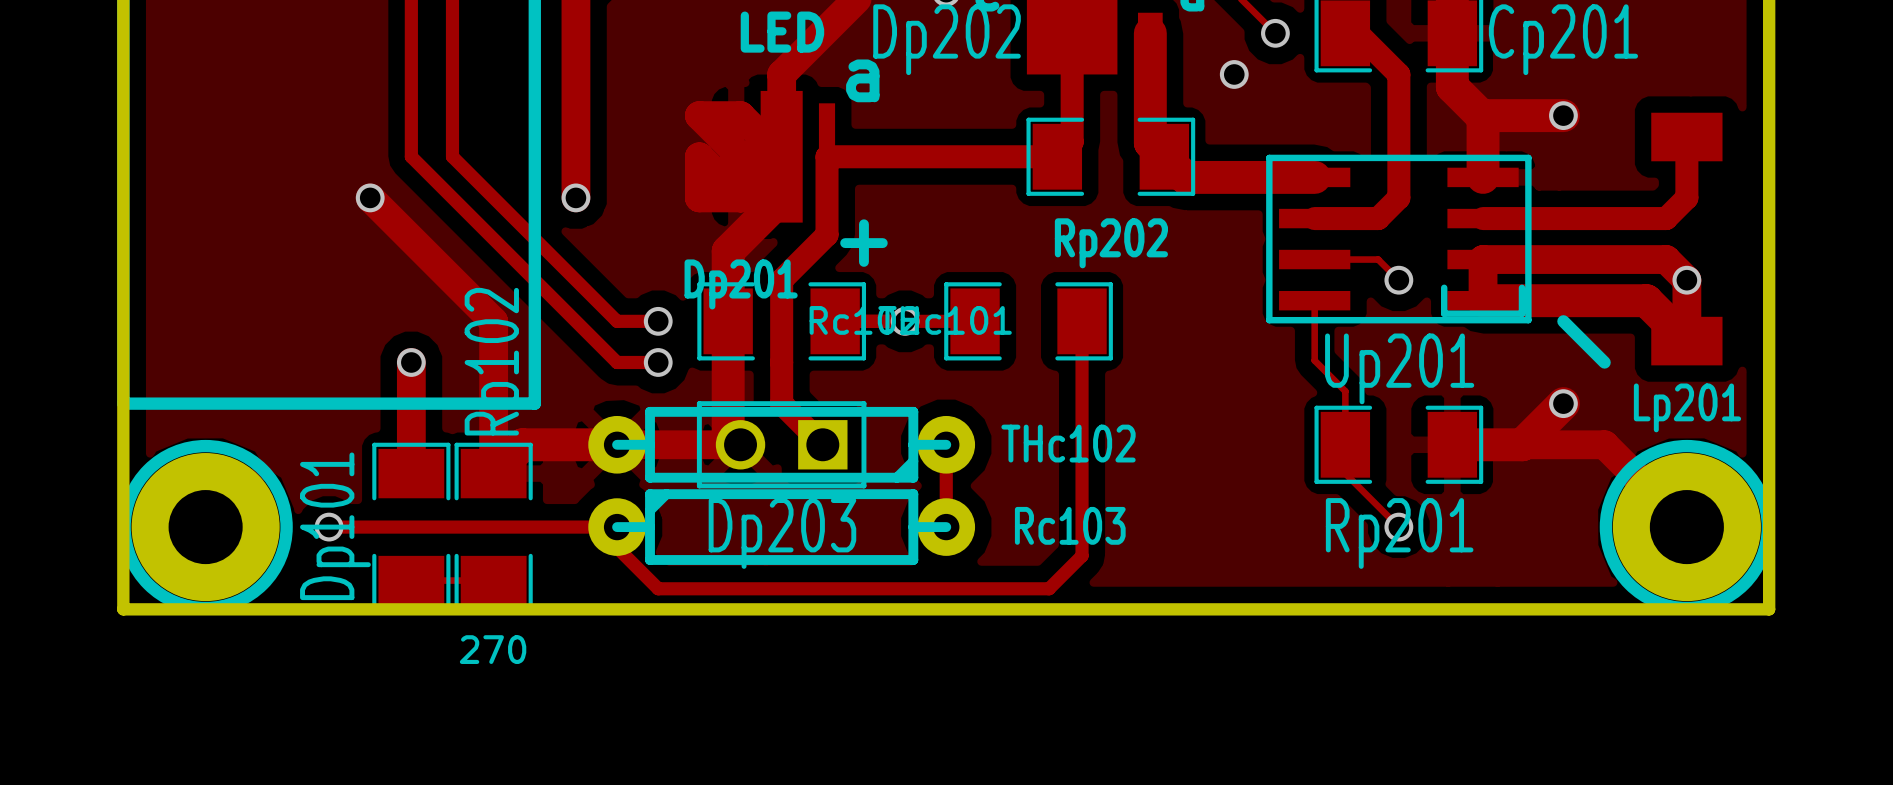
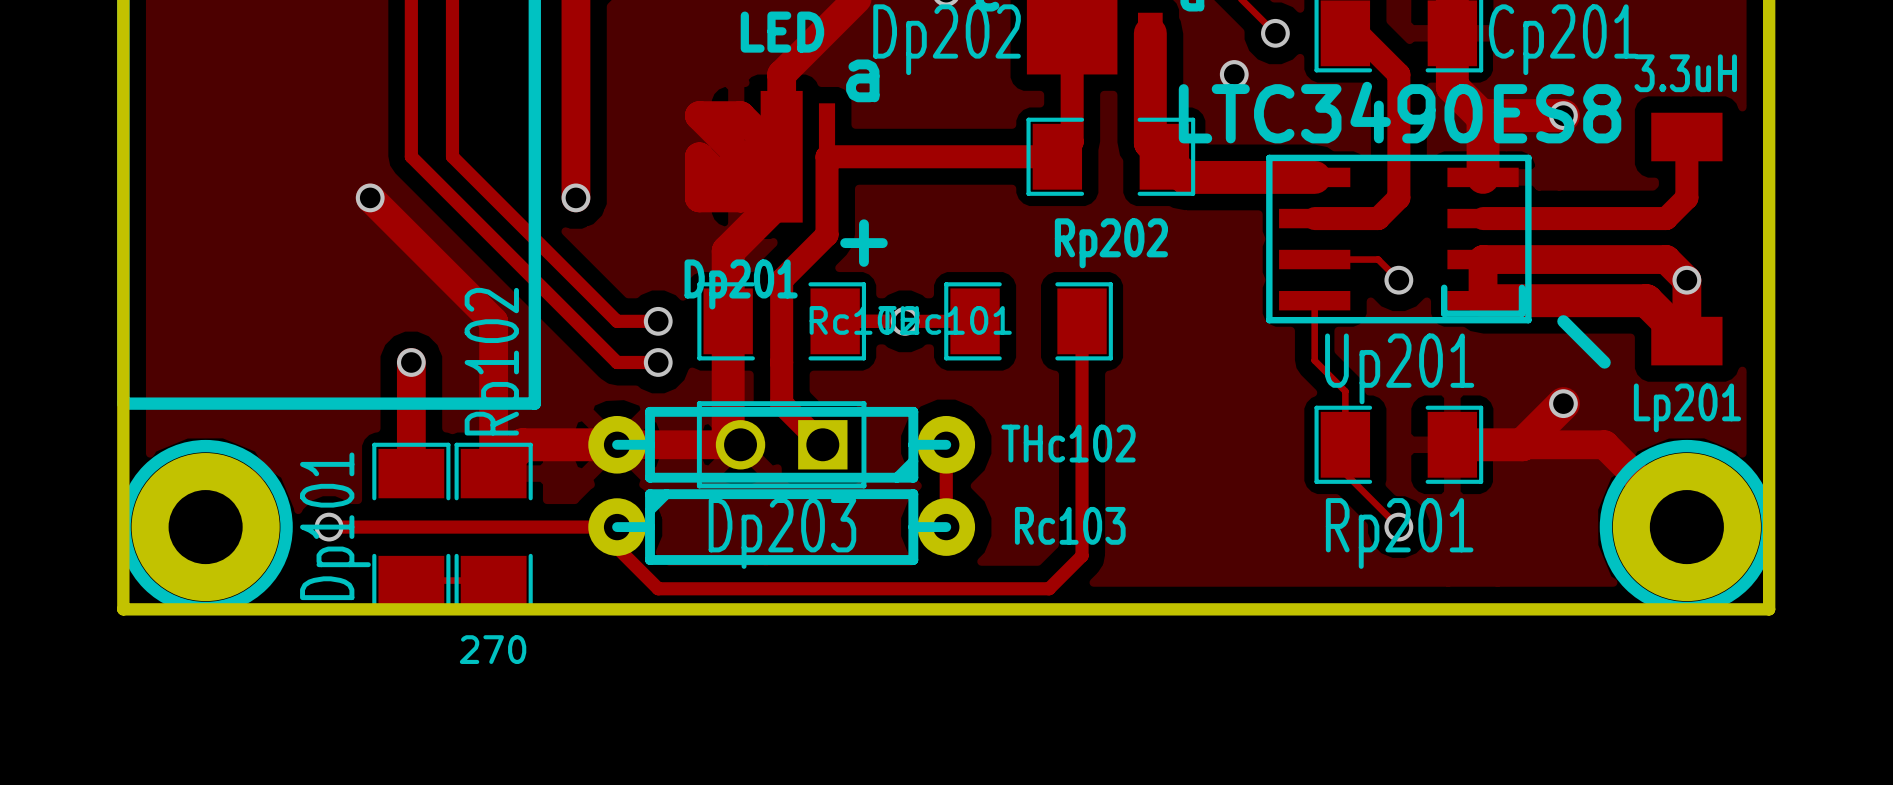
Lp201 value: none -> 3.3uH (1685, 73)
Up201 value: none -> LTC3490ES8 (1400, 112)

